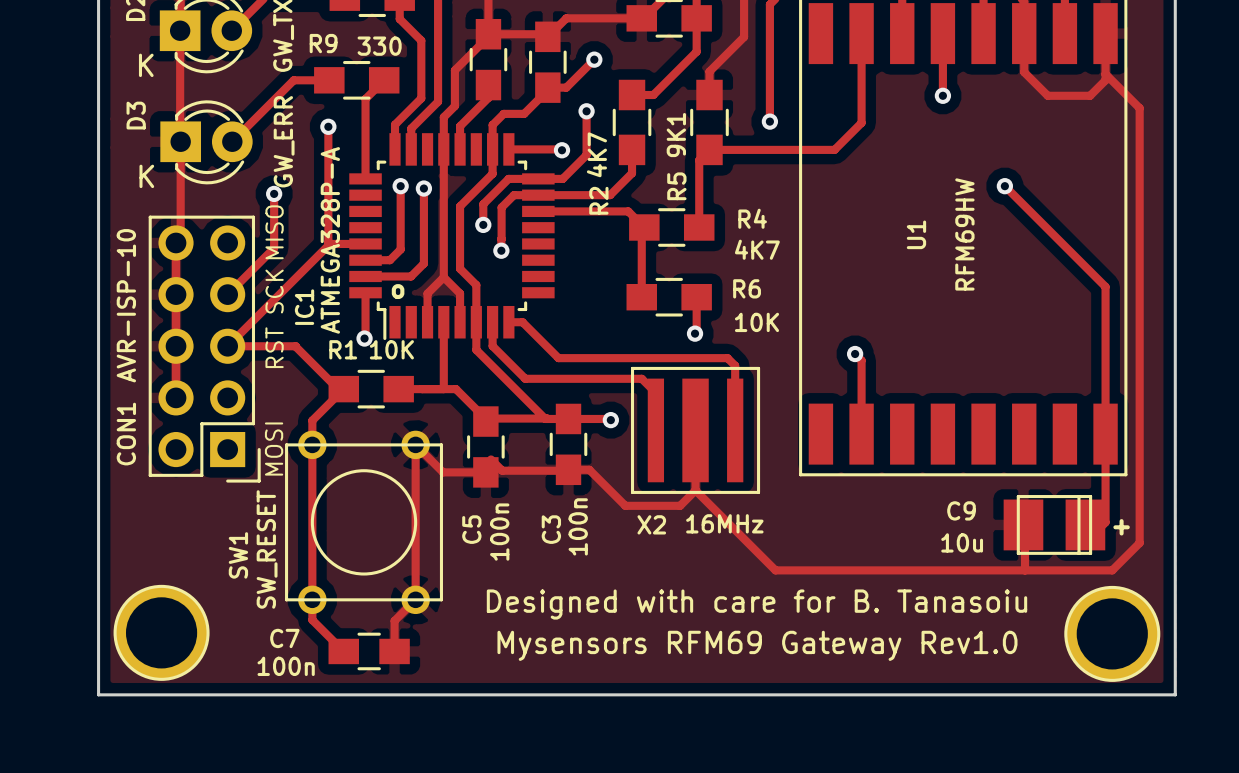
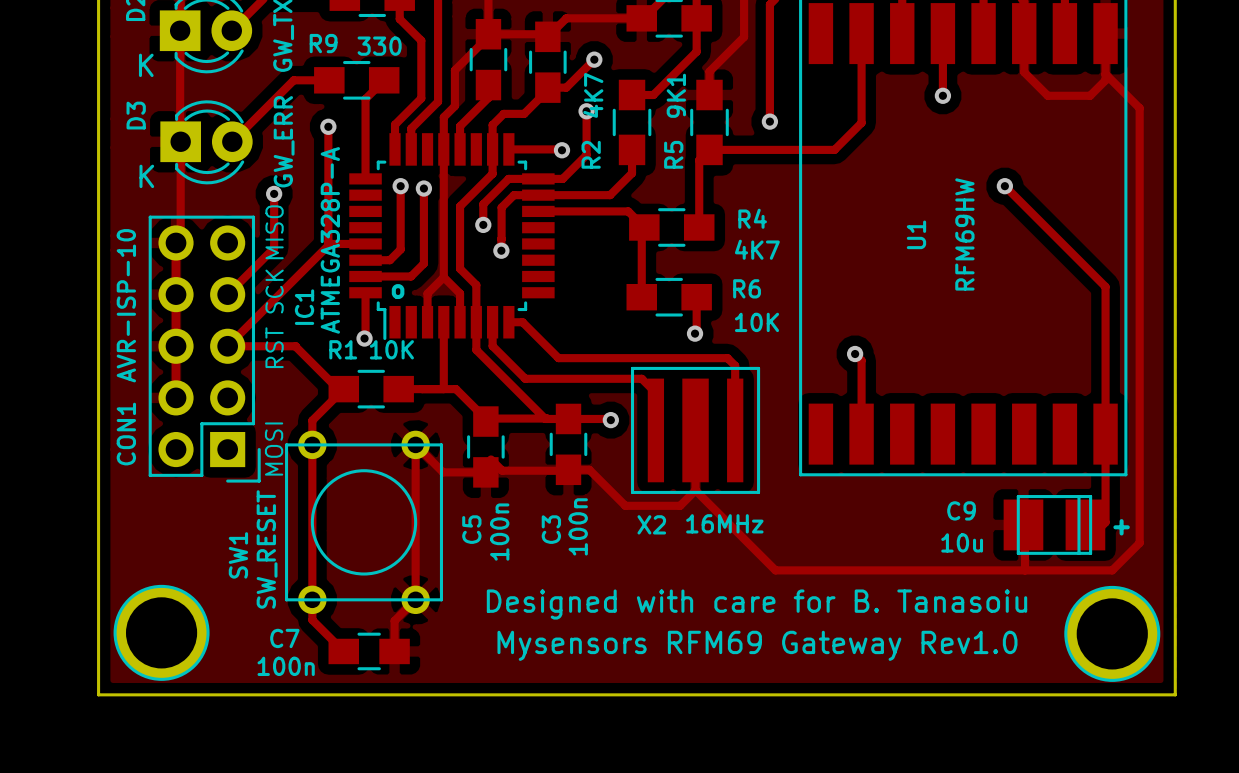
R5 value position: 9K1 (676, 135) -> 9K1 (676, 95)
R2 value position: 4K7 (596, 154) -> 4K7 (593, 95)
R5 name position: R5 (676, 186) -> R5 (673, 154)
R2 name position: R2 (598, 200) -> R2 (591, 154)

